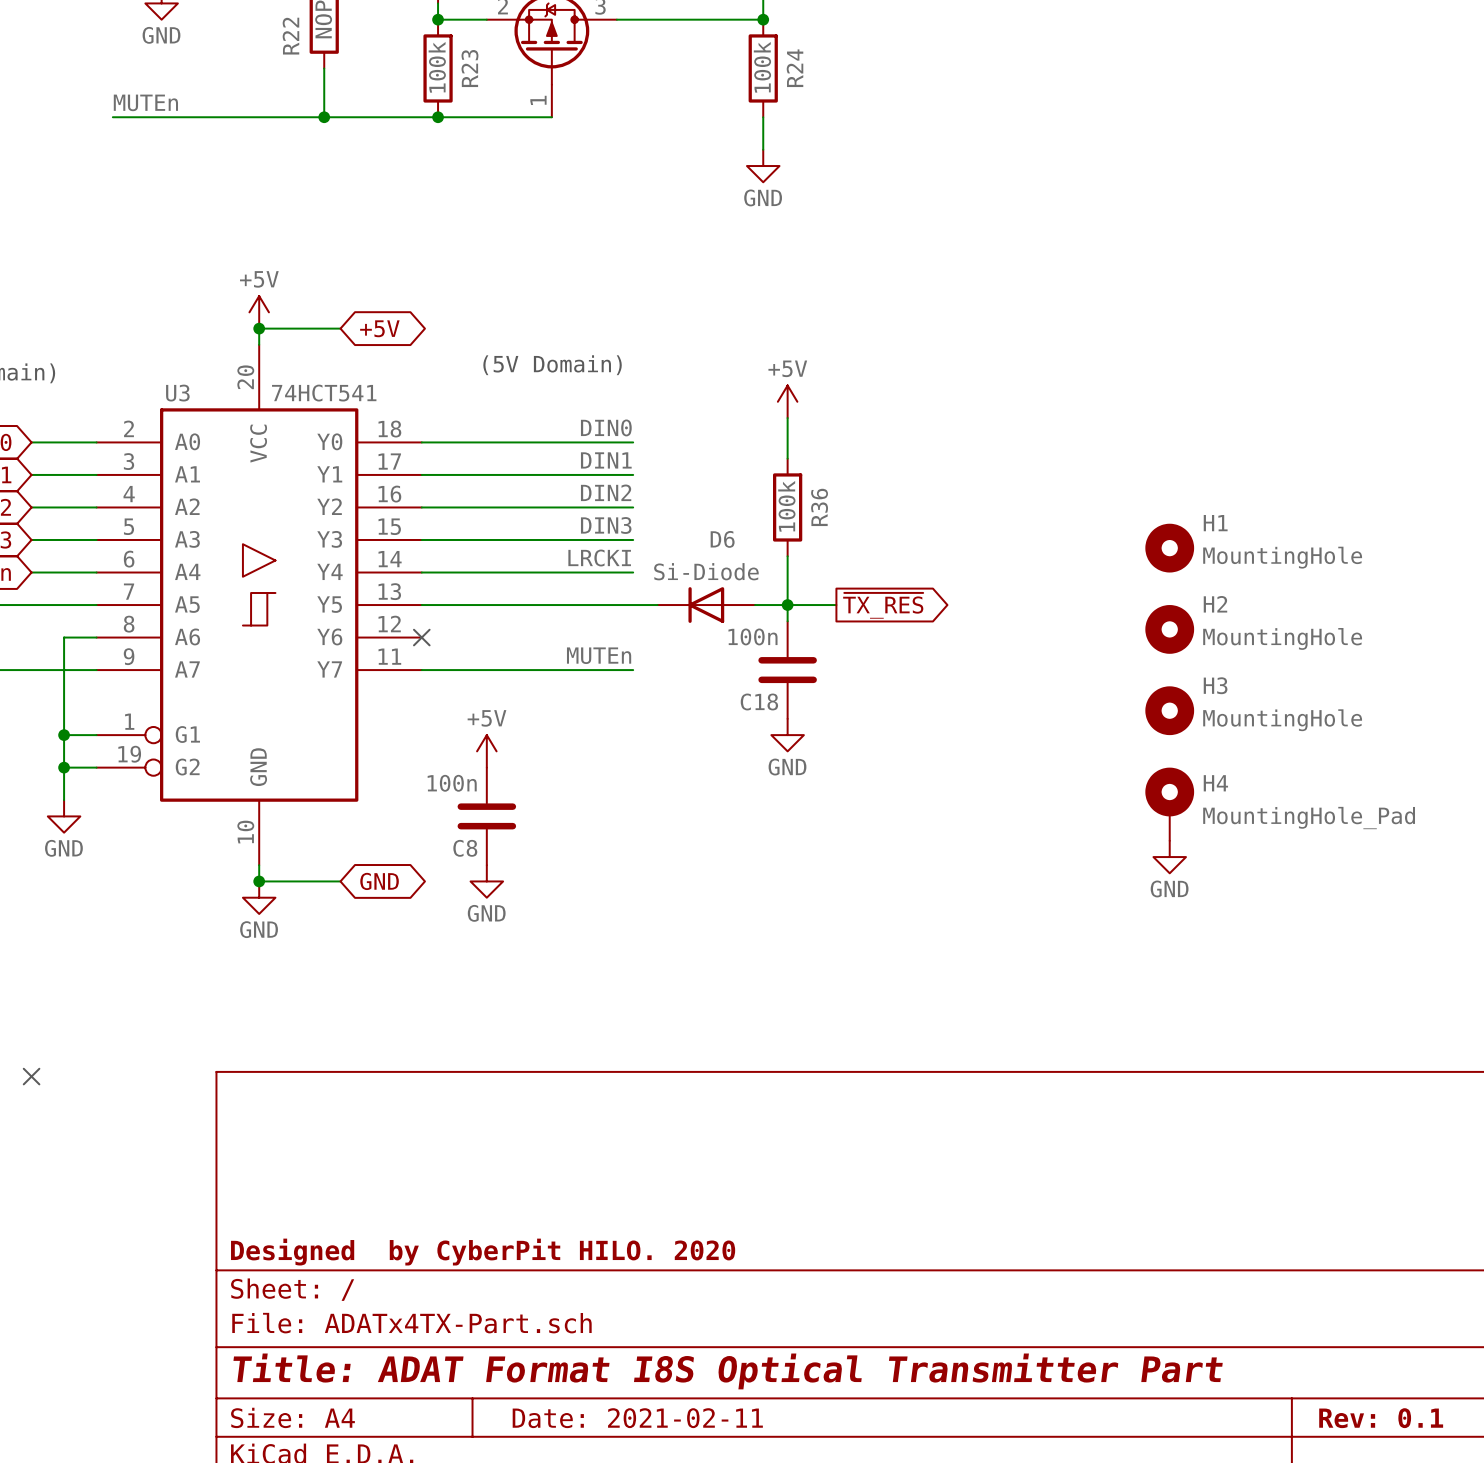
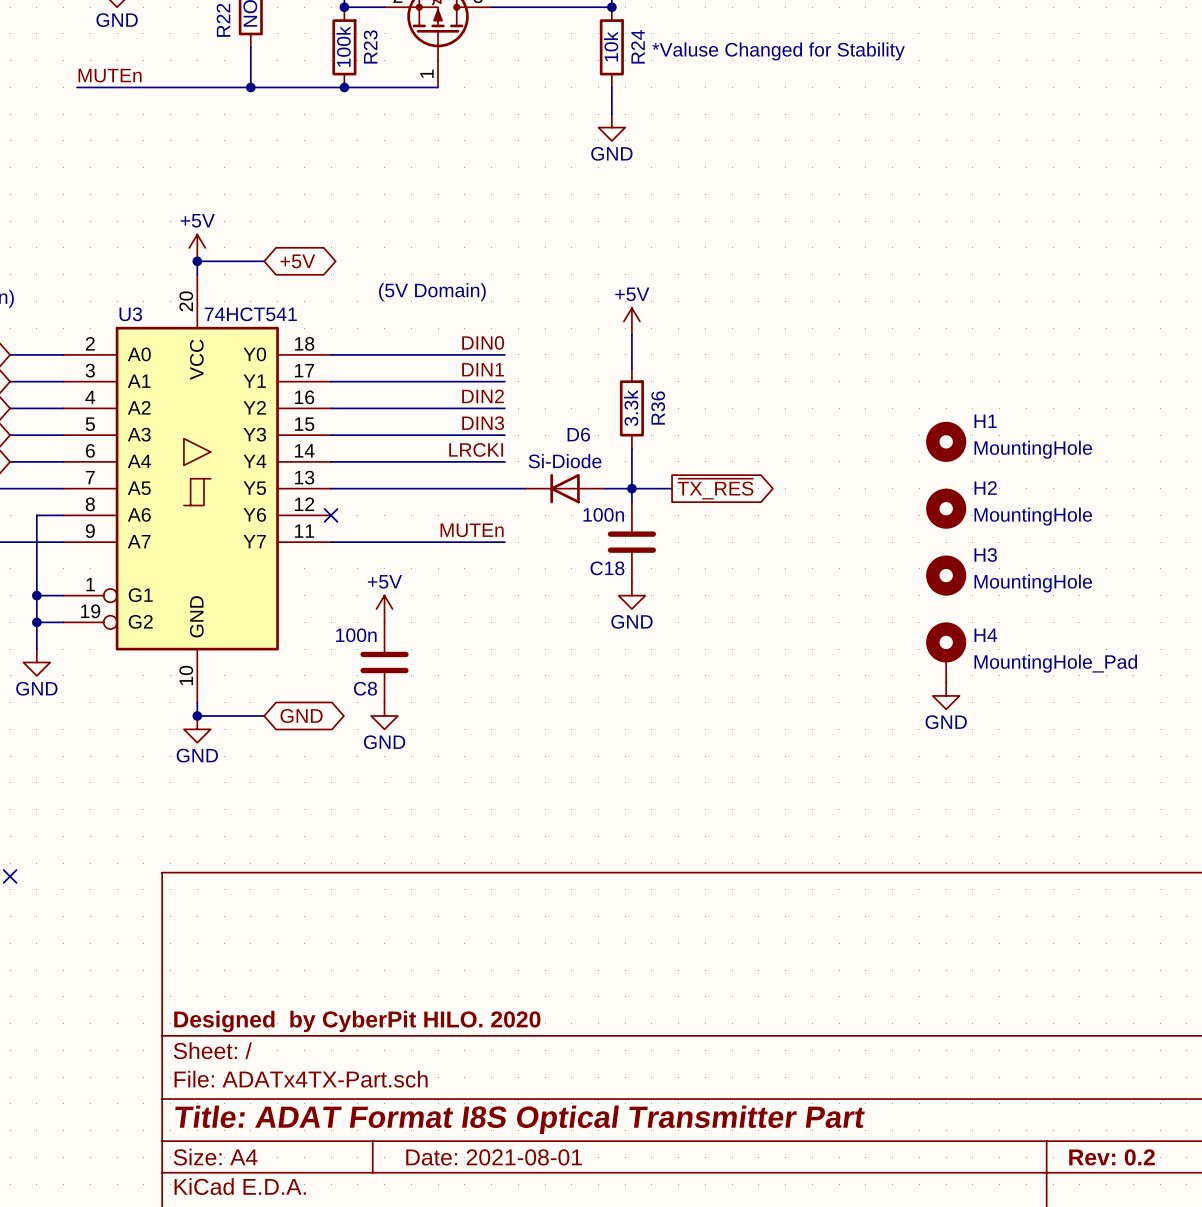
R24 value: 100k (762, 67) -> 10k (611, 46)
text: none -> *Valuse Changed for Stability (778, 51)
R36 value: 100k (786, 506) -> 3.3k (631, 408)
title block: Date: 2021-02-11 (637, 1418) -> Date: 2021-08-01 (494, 1157)
title block: Rev: 0.1 (1381, 1418) -> Rev: 0.2 (1112, 1157)

